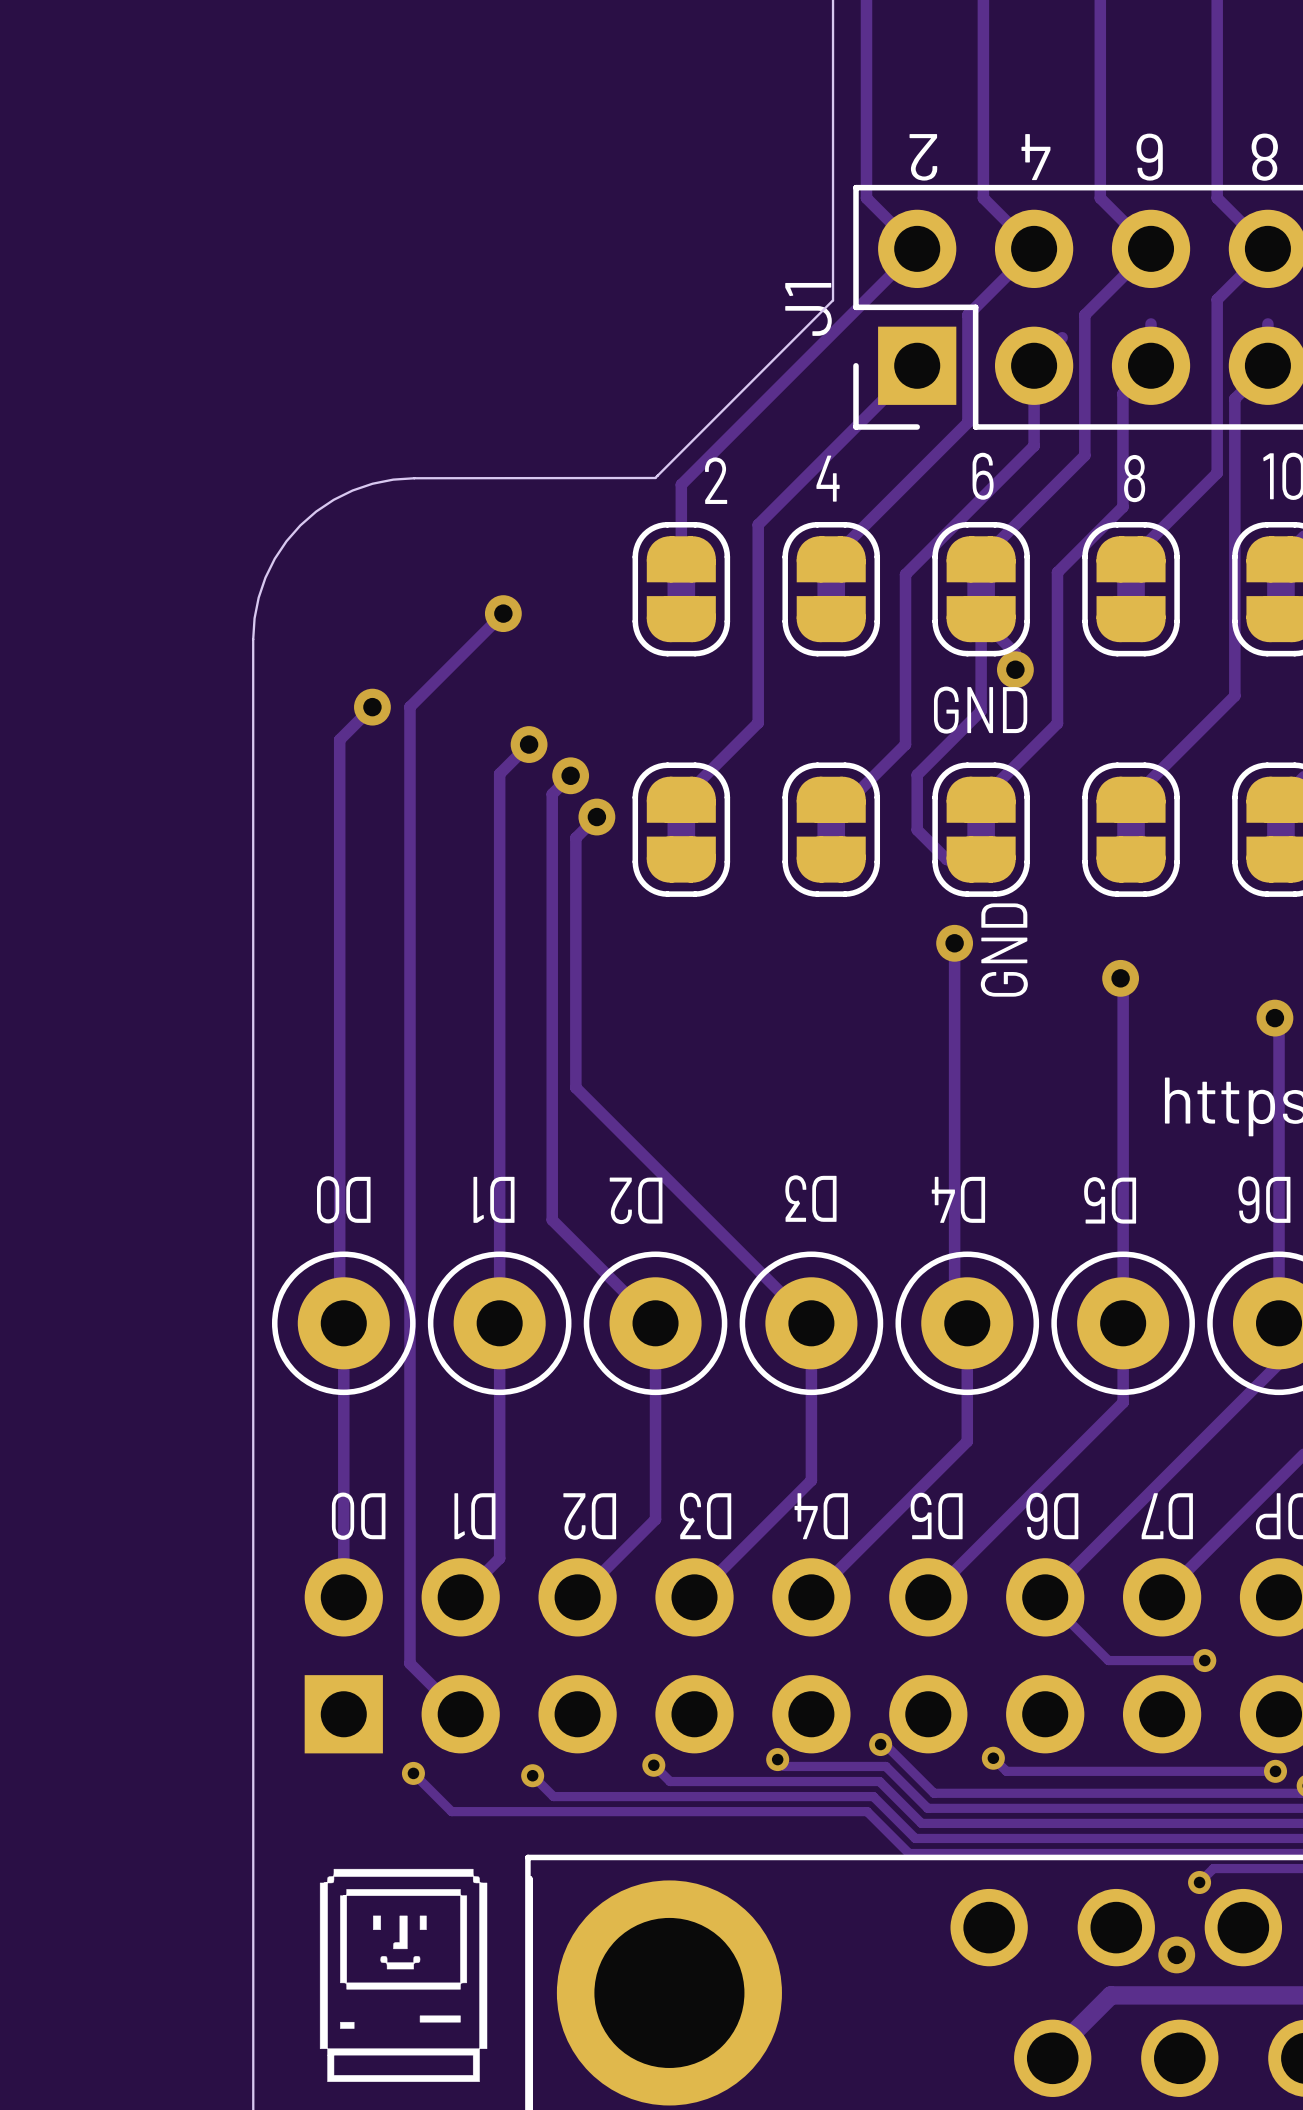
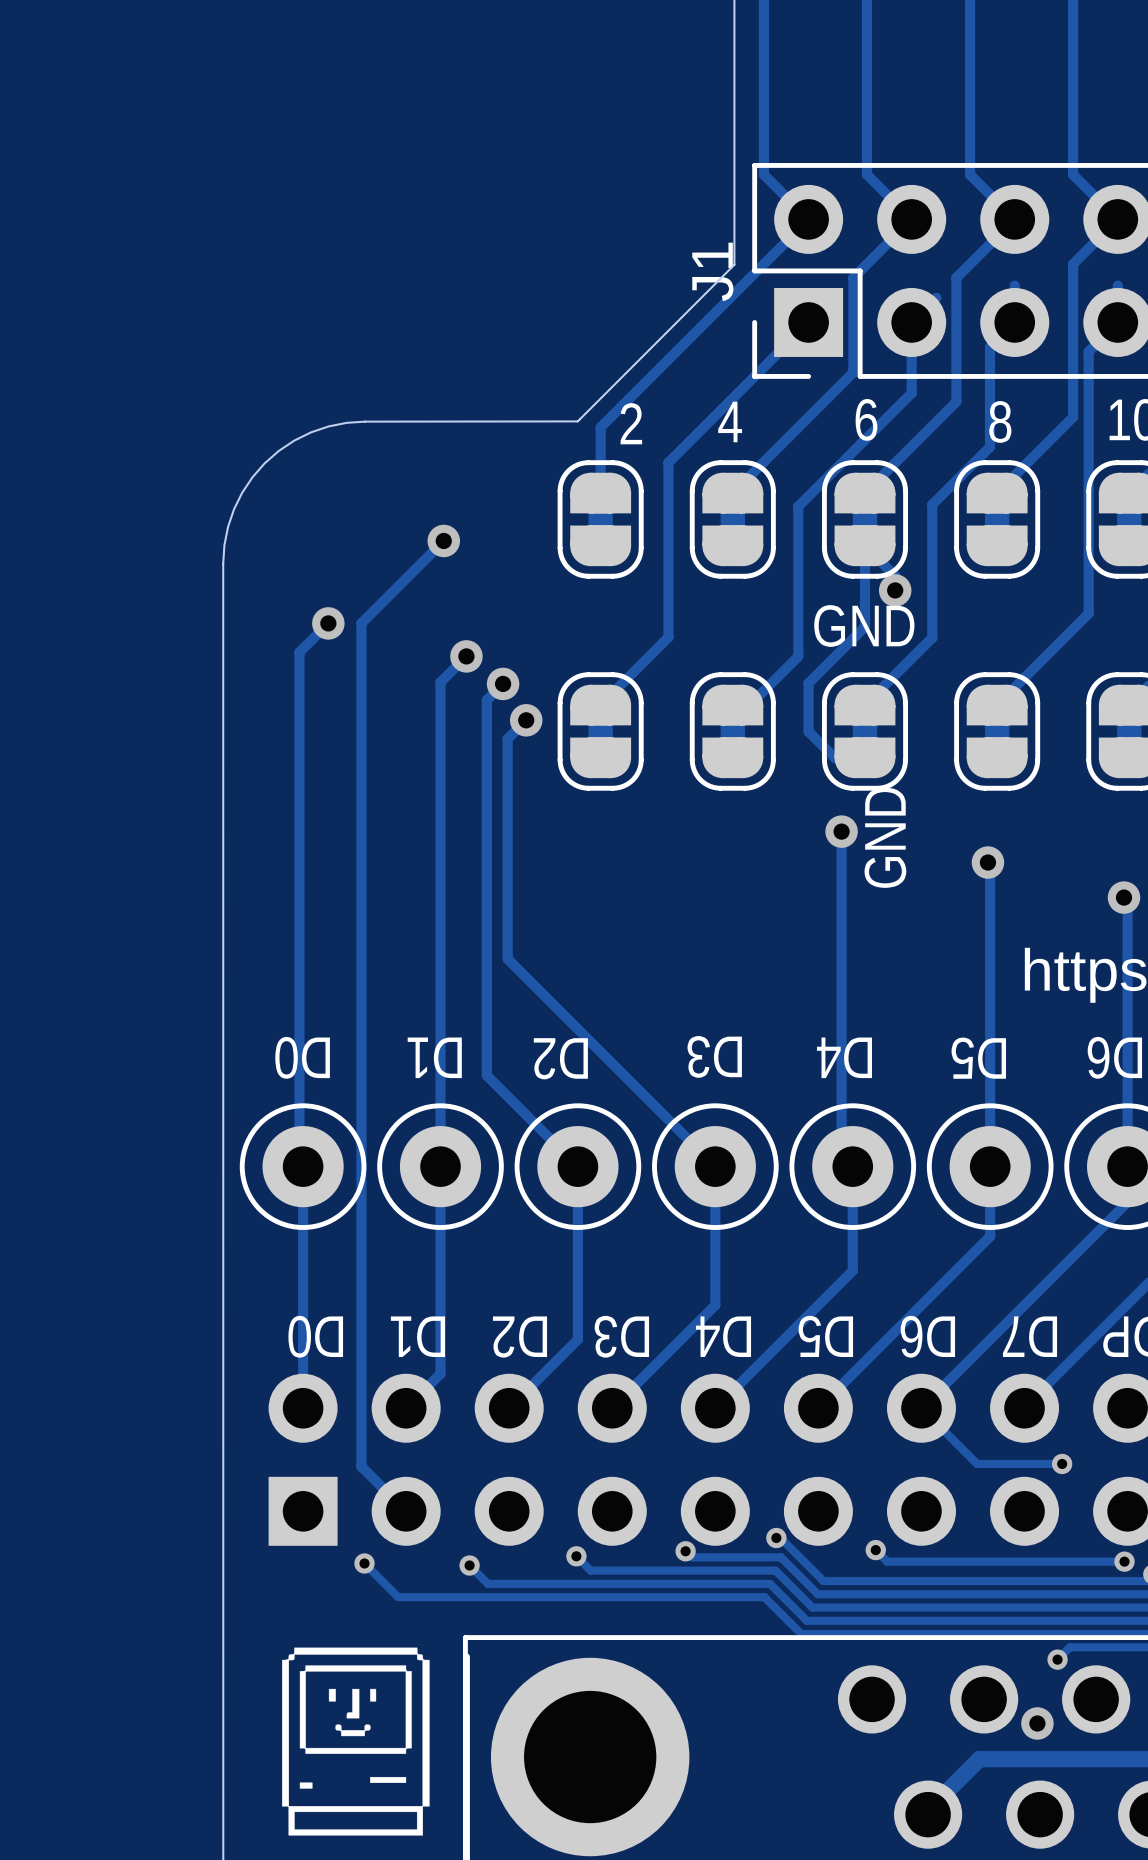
text: 2 (923, 157) -> none
text: 4 (1035, 157) -> none
text: 6 (1149, 157) -> none
text: 8 (1264, 157) -> none

